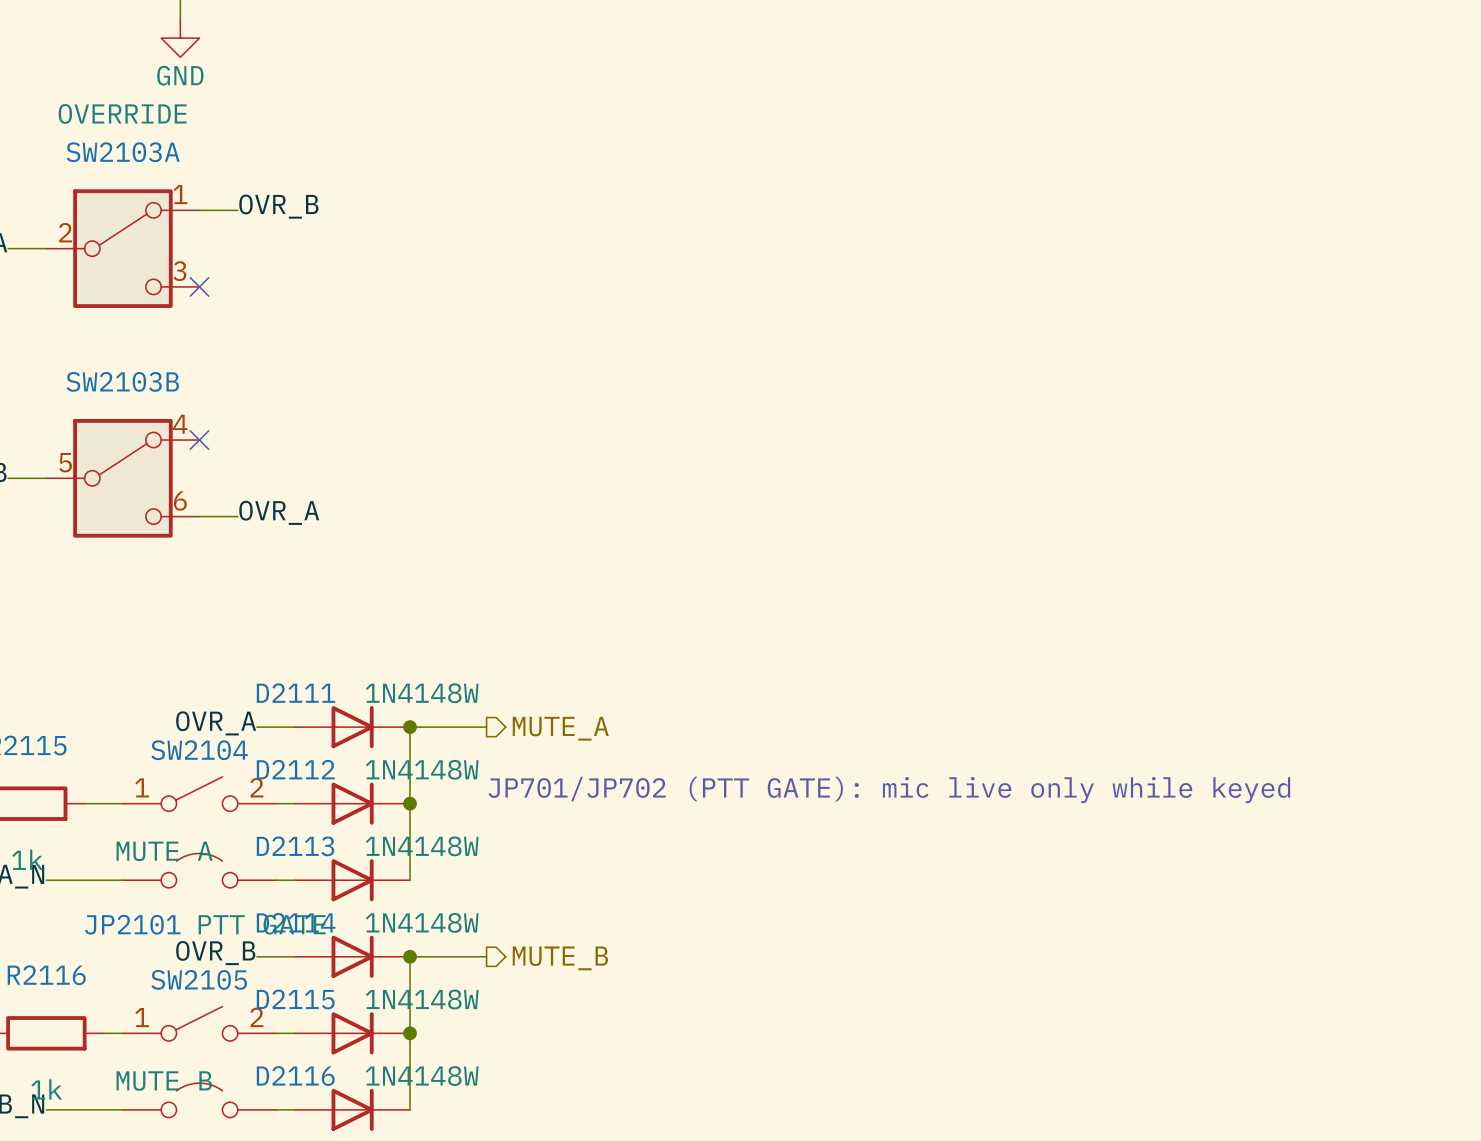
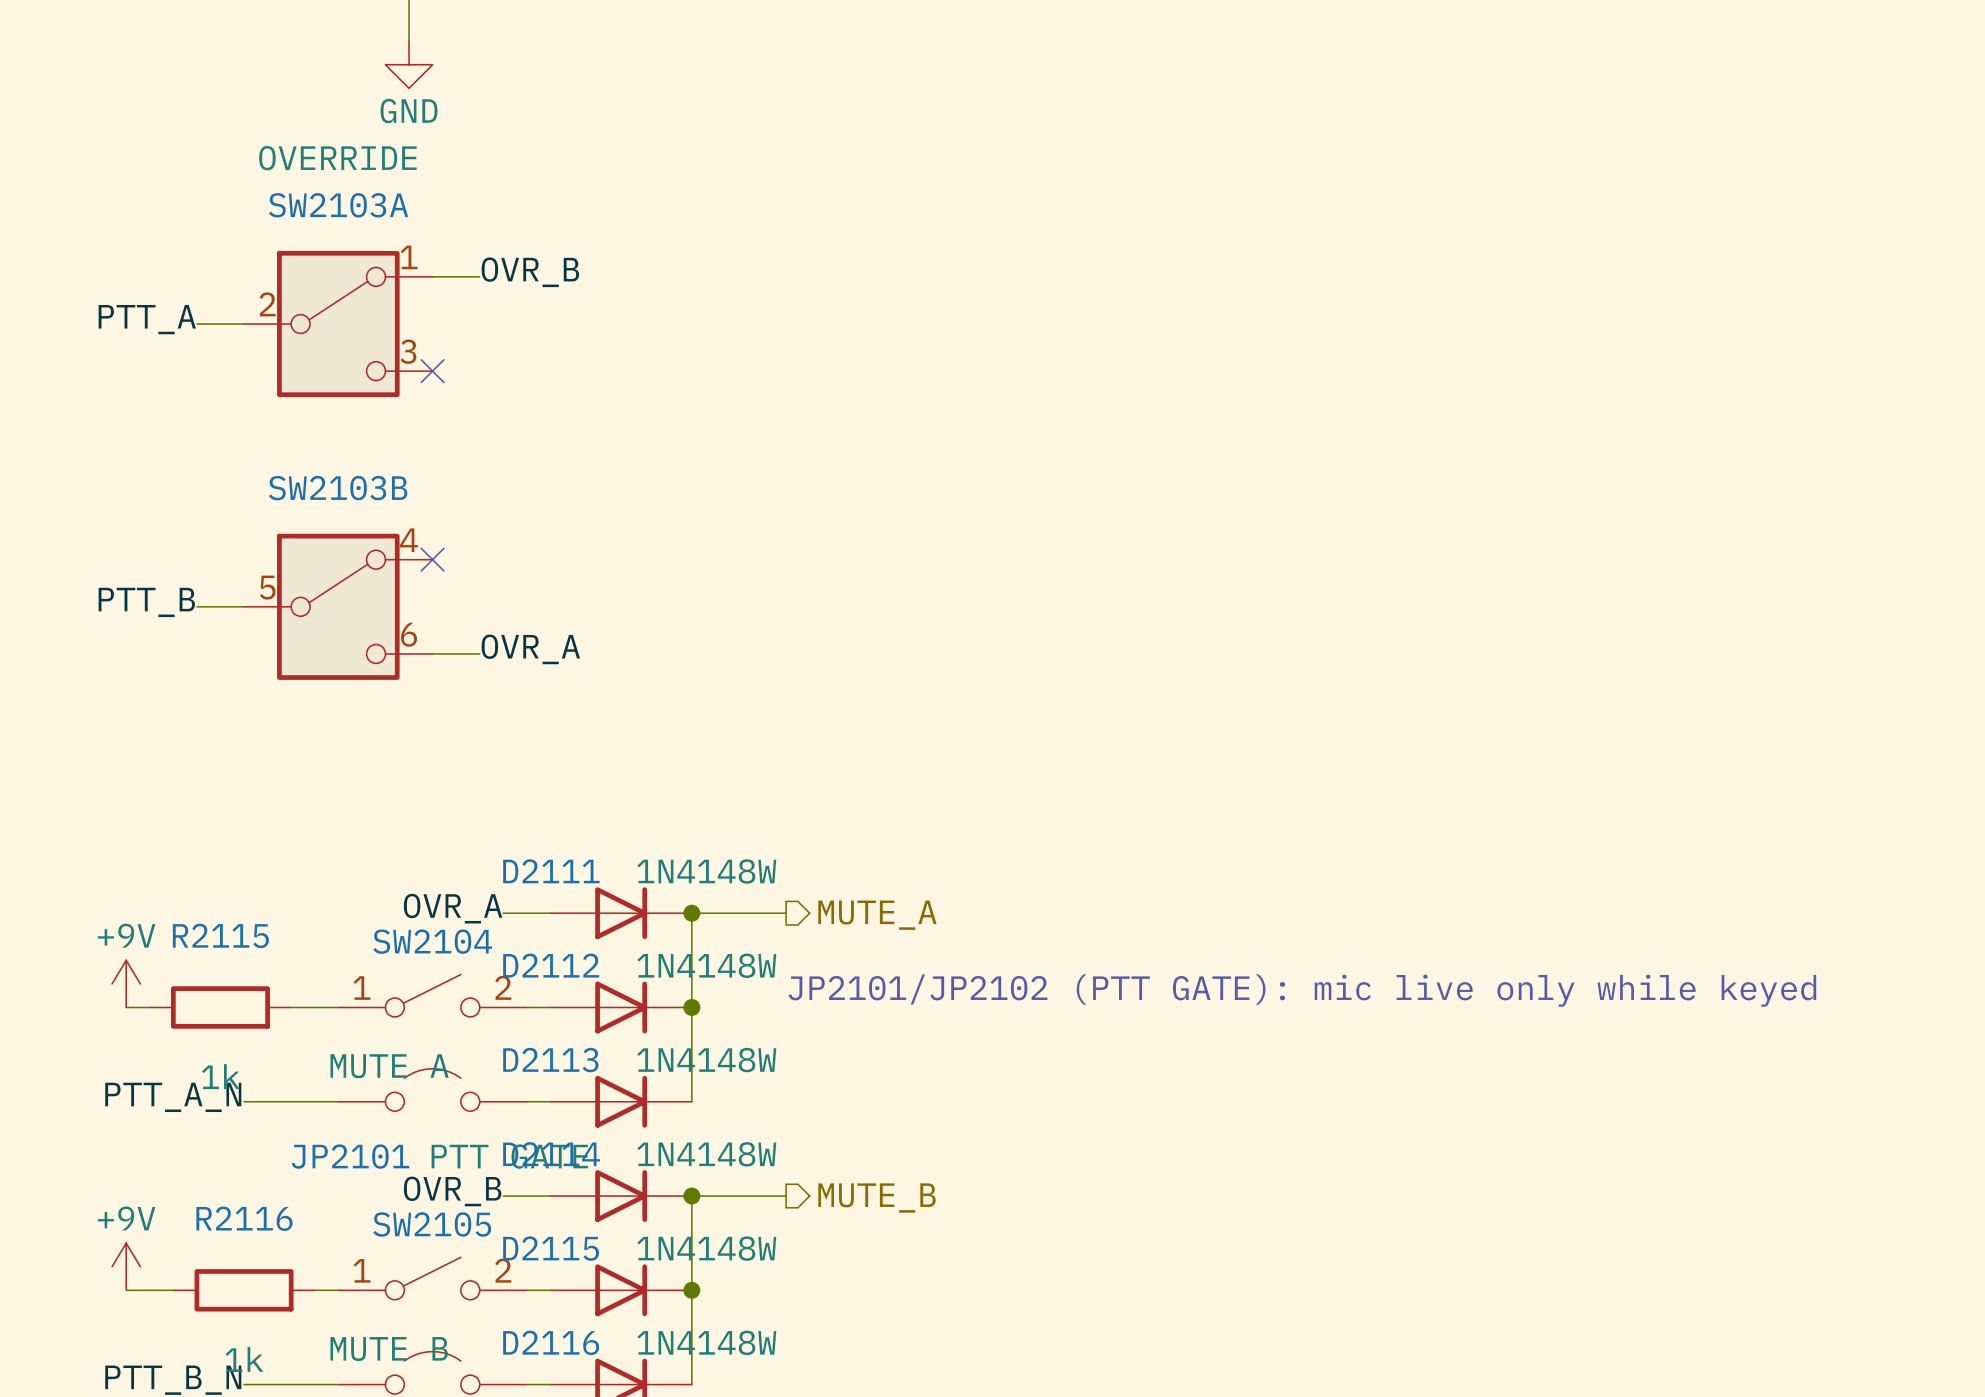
text: JP701/JP702 (PTT GATE): mic live only while keyed (889, 789) -> JP2101/JP2102 (PTT GATE): mic live only while keyed (1302, 990)

